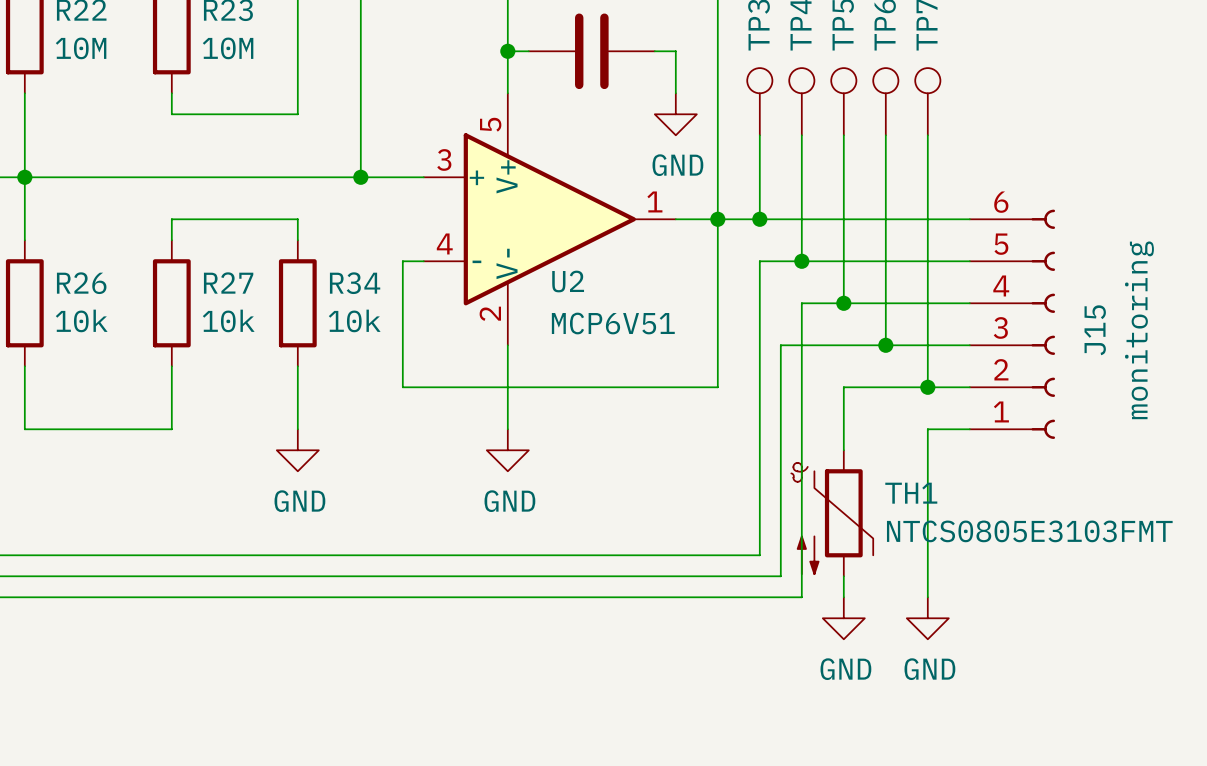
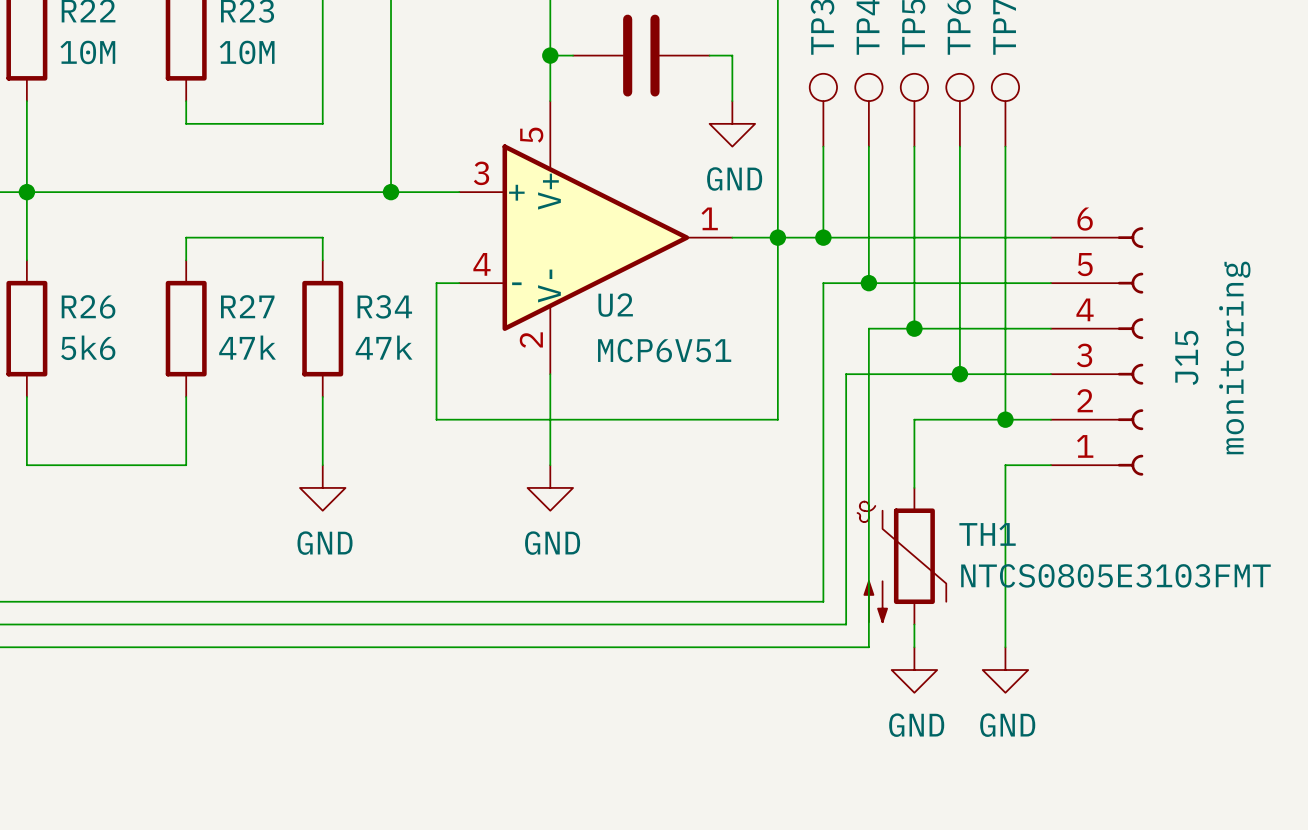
R26 value: 10k (81, 320) -> 5k6 (88, 347)
R27 value: 10k (228, 320) -> 47k (247, 347)
R34 value: 10k (354, 320) -> 47k (384, 347)

